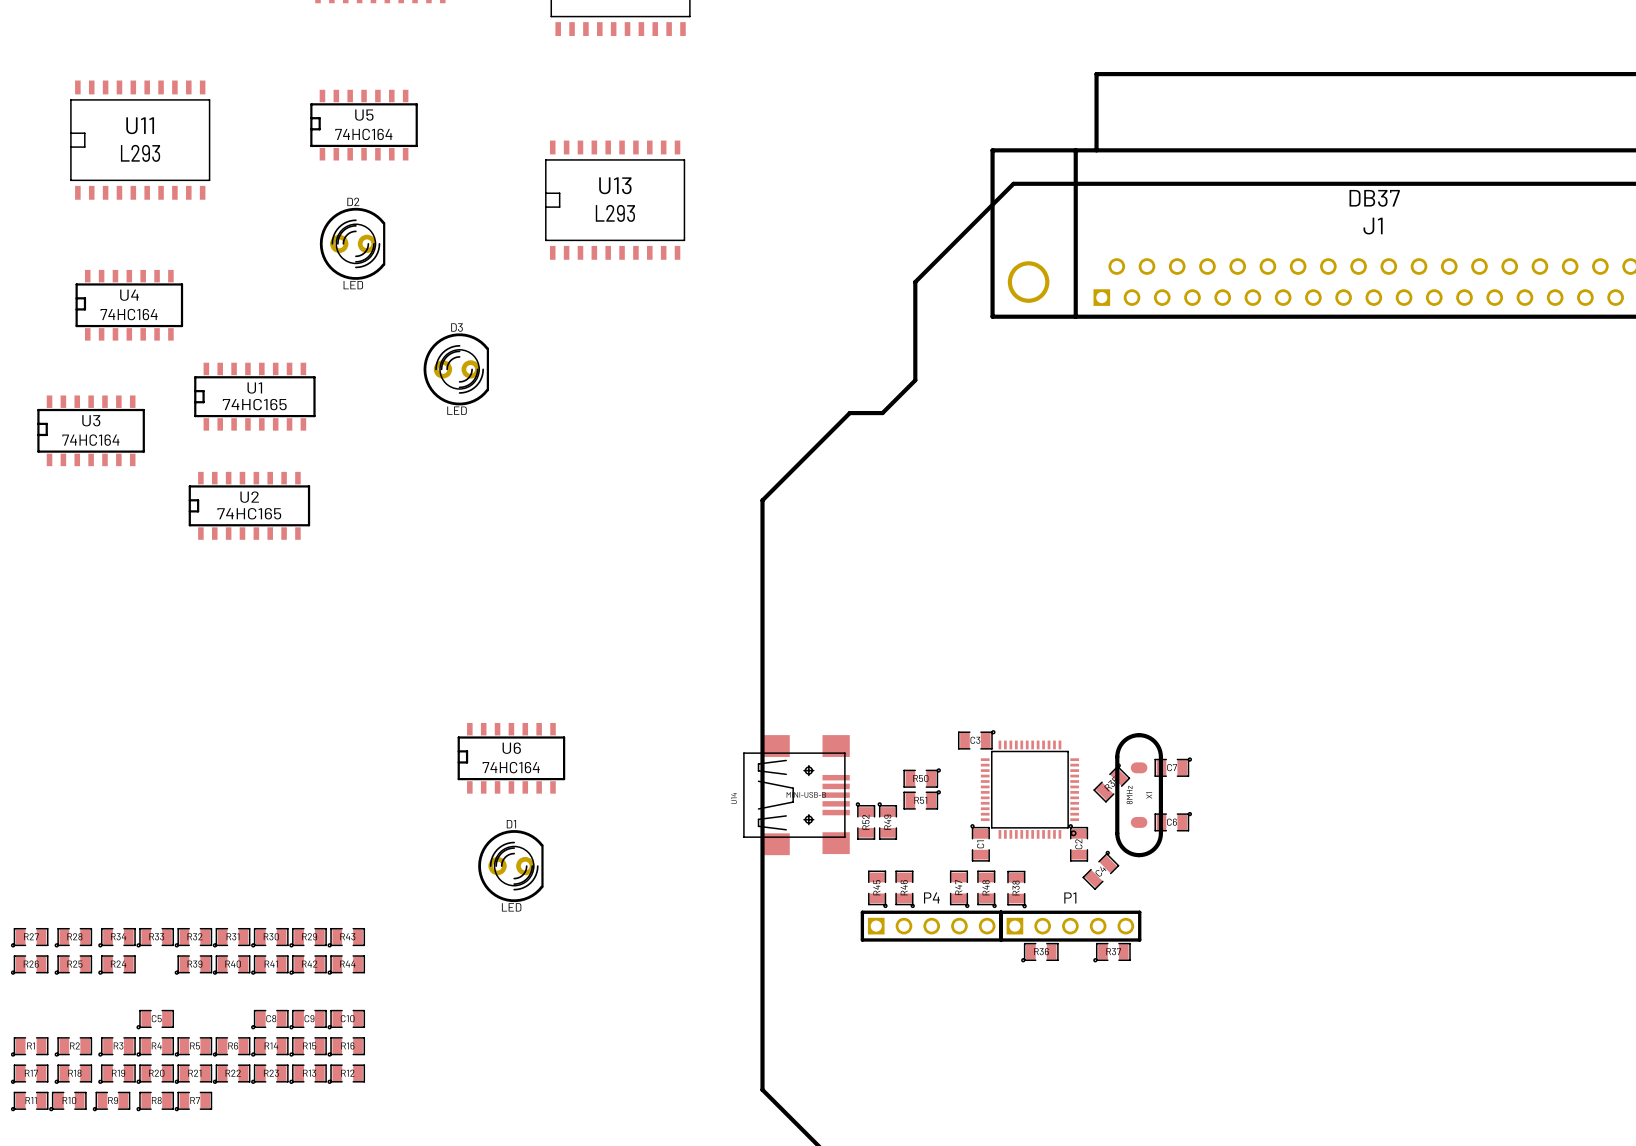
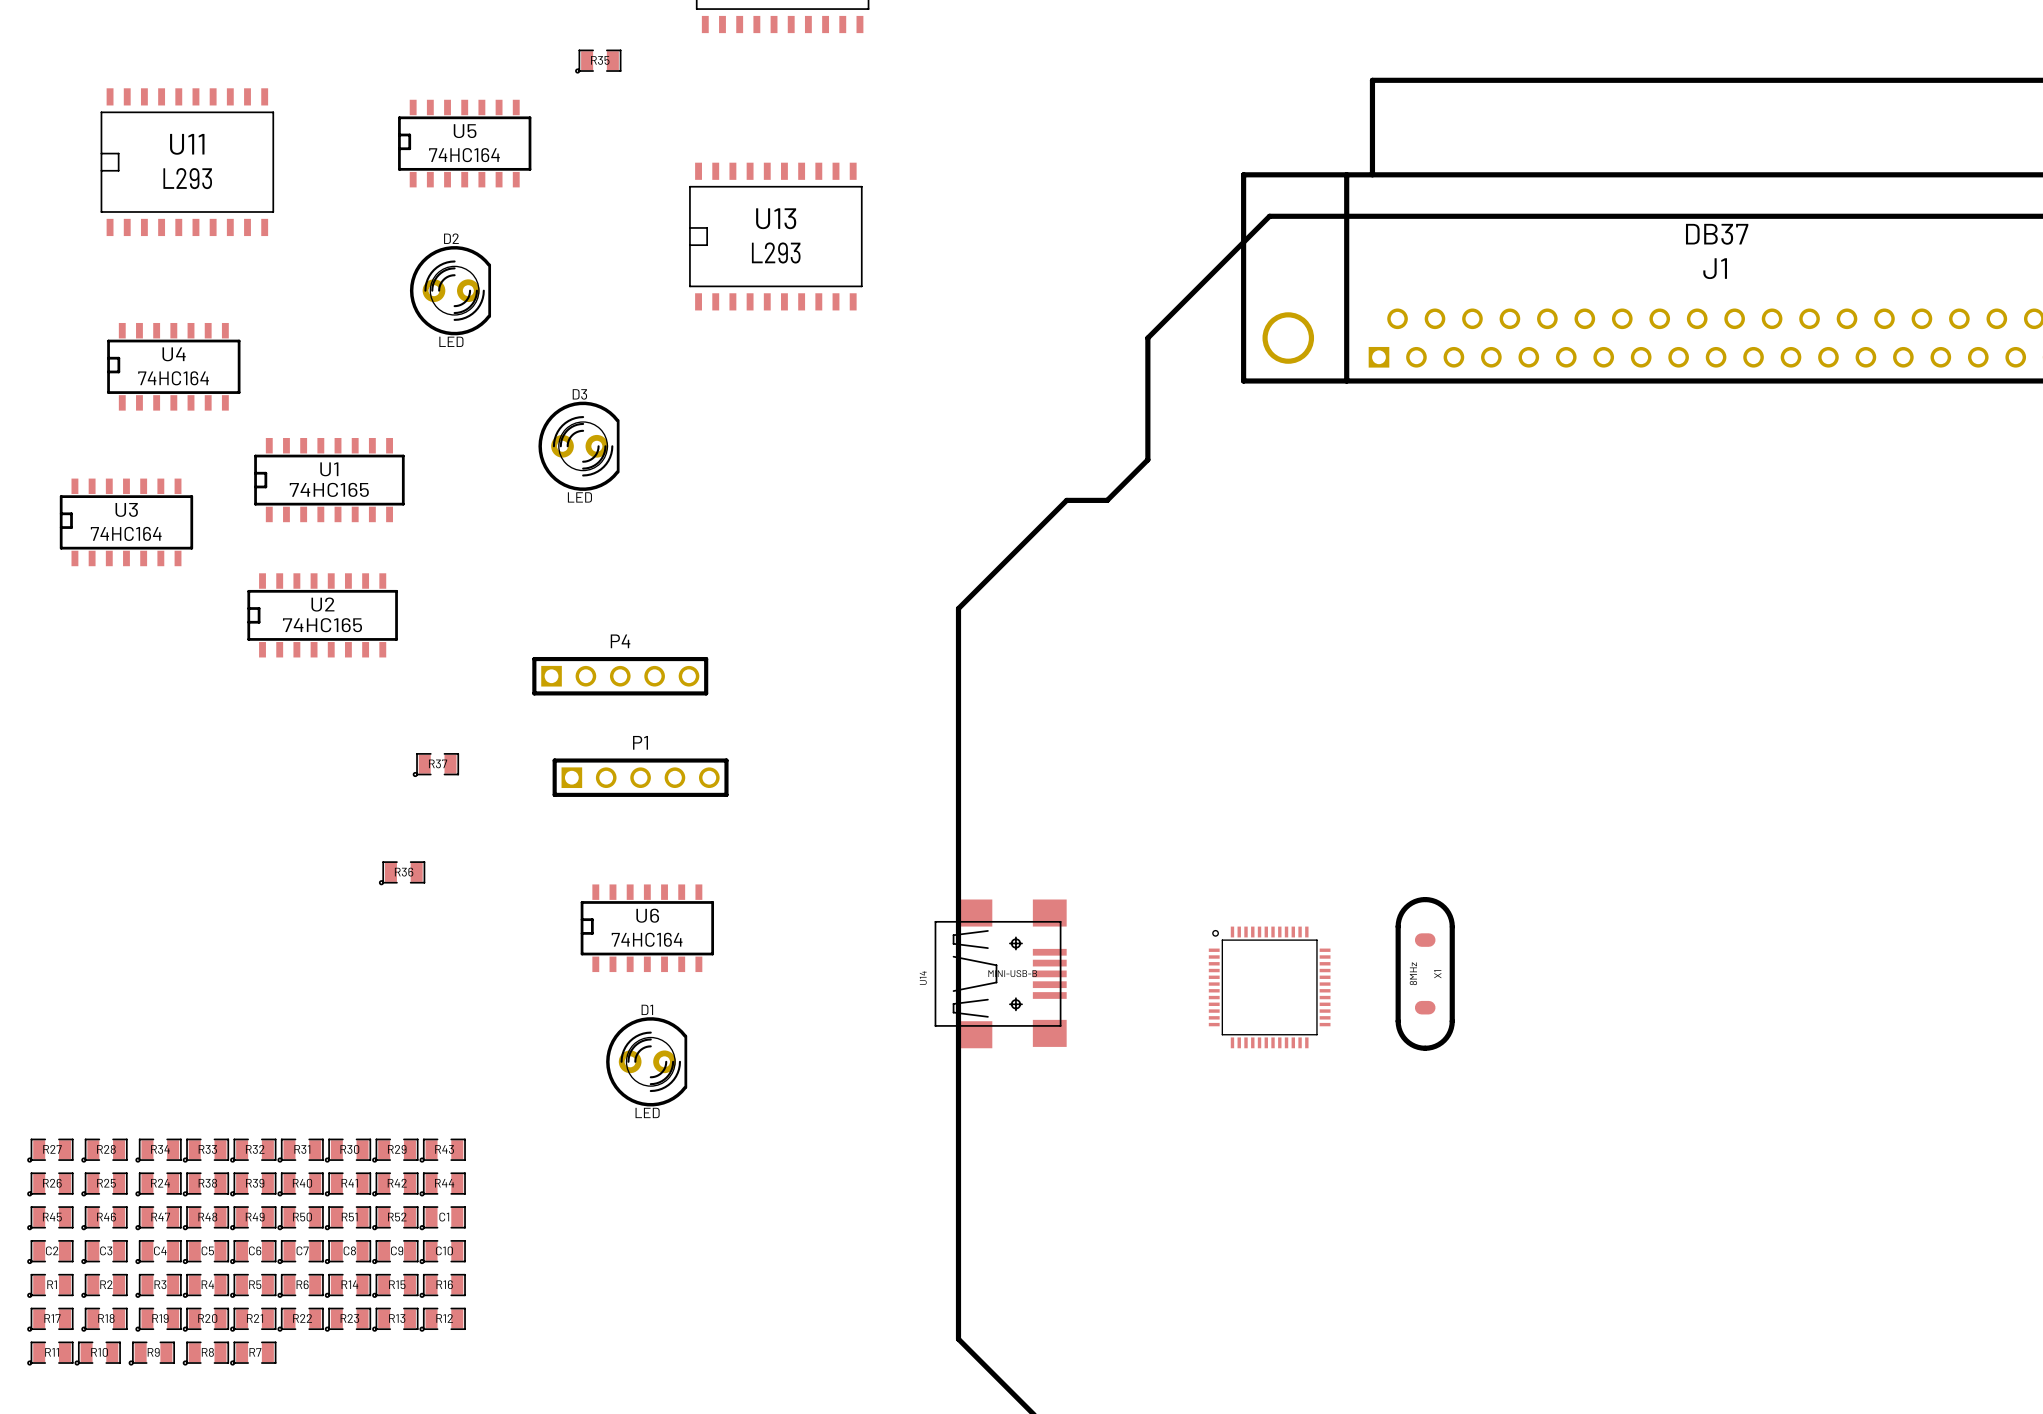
C3 rotation: 0° (976, 739) -> 180° (104, 1252)
C3 position: (976, 739) -> (104, 1252)
C7 rotation: 0° (1173, 767) -> 180° (300, 1252)
C7 position: (1173, 767) -> (300, 1252)
R50 rotation: 0° (922, 778) -> 180° (300, 1218)
R50 position: (922, 778) -> (300, 1218)
R35 rotation: 0° (1111, 783) -> 135° counterclockwise (598, 61)
R35 position: (1111, 783) -> (598, 61)
part rotation: 0° (1029, 789) -> 180° (1269, 987)
R51 rotation: 0° (922, 799) -> 180° (347, 1218)
R51 position: (922, 799) -> (347, 1218)
R52 rotation: 0° (865, 821) -> 90° counterclockwise (395, 1218)
R52 position: (865, 821) -> (395, 1218)
R49 rotation: 0° (887, 821) -> 90° counterclockwise (253, 1218)
R49 position: (887, 821) -> (253, 1218)
C6 rotation: 0° (1173, 821) -> 180° (253, 1252)
C6 position: (1173, 821) -> (253, 1252)
C1 rotation: 0° (980, 842) -> 90° counterclockwise (442, 1218)
C1 position: (980, 842) -> (442, 1218)
C2 rotation: 0° (1078, 842) -> 90° counterclockwise (50, 1252)
C2 position: (1078, 842) -> (50, 1252)
C4 rotation: 0° (1100, 870) -> 135° counterclockwise (158, 1252)
C4 position: (1100, 870) -> (158, 1252)
R45 rotation: 0° (877, 889) -> 90° clockwise (50, 1218)
R45 position: (877, 889) -> (50, 1218)
R46 rotation: 0° (905, 889) -> 90° clockwise (104, 1218)
R46 position: (905, 889) -> (104, 1218)
R47 rotation: 0° (959, 889) -> 90° clockwise (158, 1218)
R47 position: (959, 889) -> (158, 1218)
R48 rotation: 0° (986, 889) -> 90° clockwise (205, 1218)
R48 position: (986, 889) -> (205, 1218)
R38 rotation: 0° (1017, 889) -> 90° clockwise (205, 1184)
R38 position: (1017, 889) -> (205, 1184)
P4 position: (931, 926) -> (620, 676)
P1 position: (1070, 926) -> (640, 777)
R36 position: (1039, 952) -> (402, 873)
R37 position: (1111, 952) -> (435, 765)

